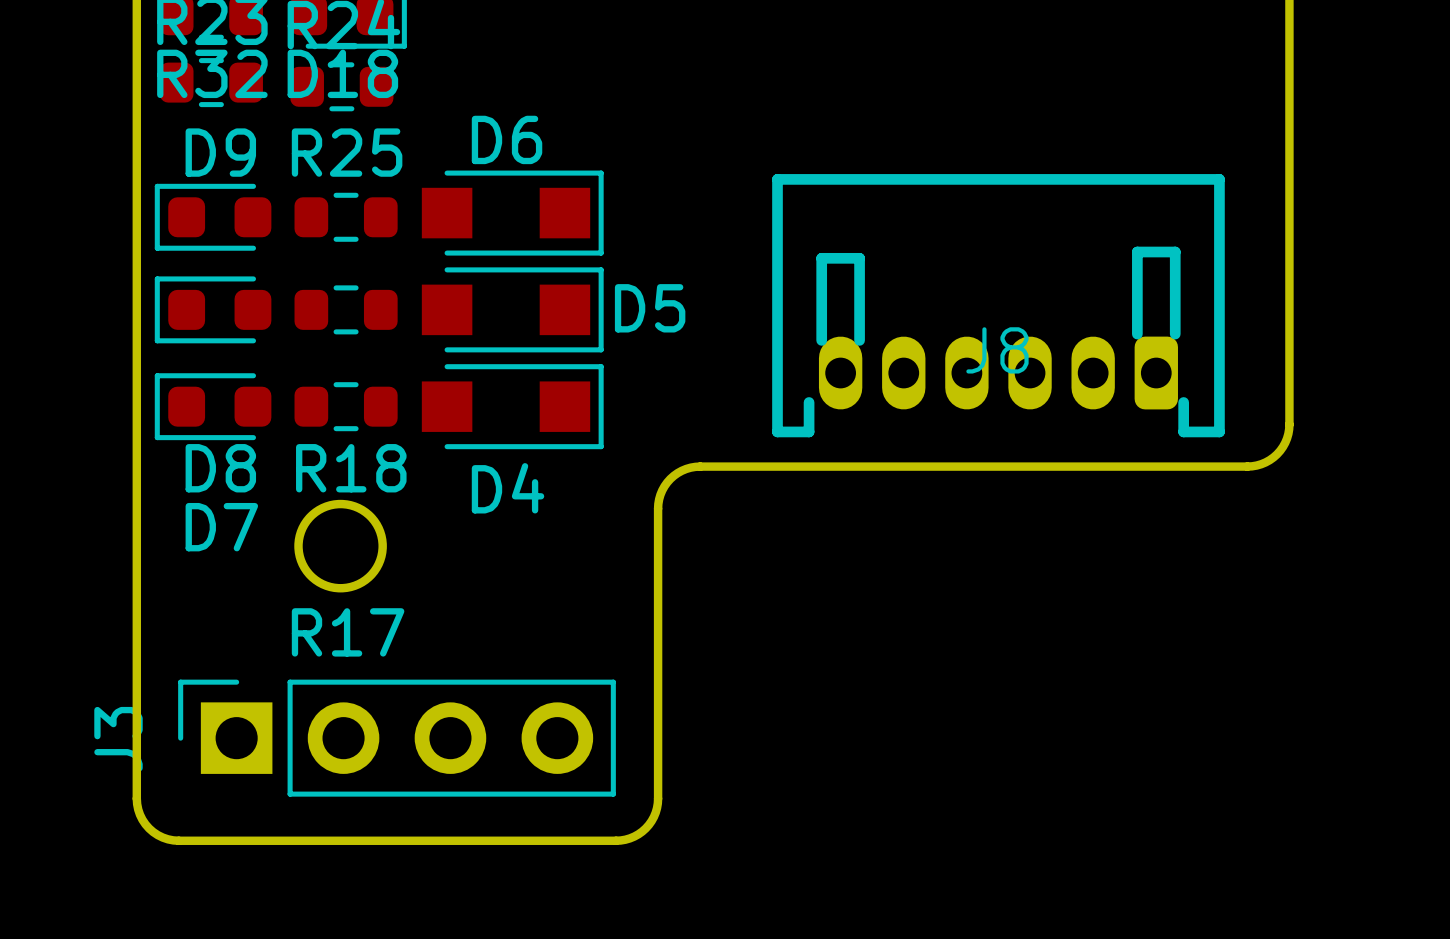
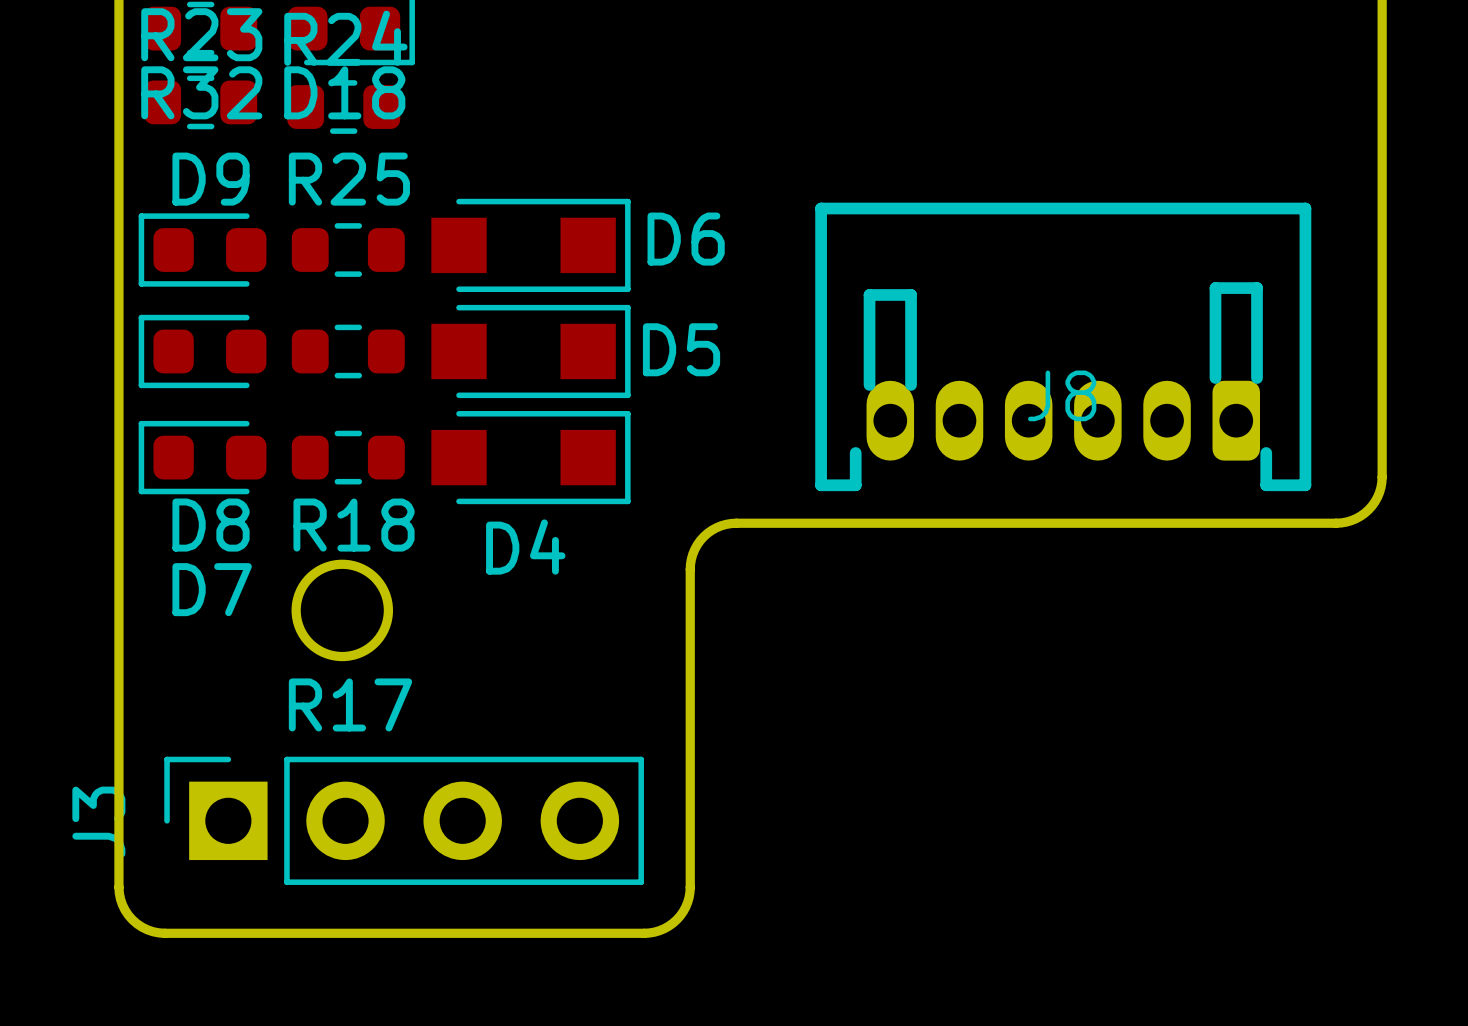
D6 name position: D6 (507, 139) -> D6 (686, 239)

